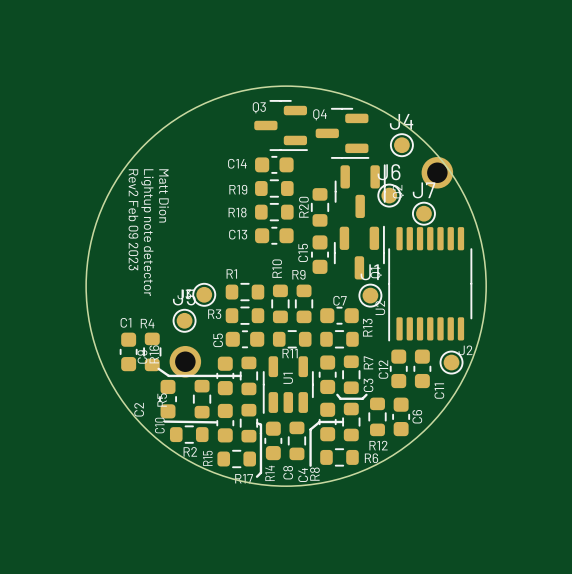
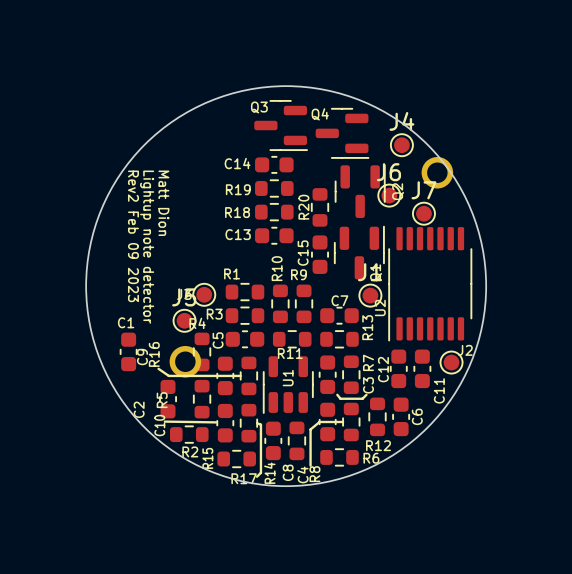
R4 position: (152, 351) -> (202, 351)

